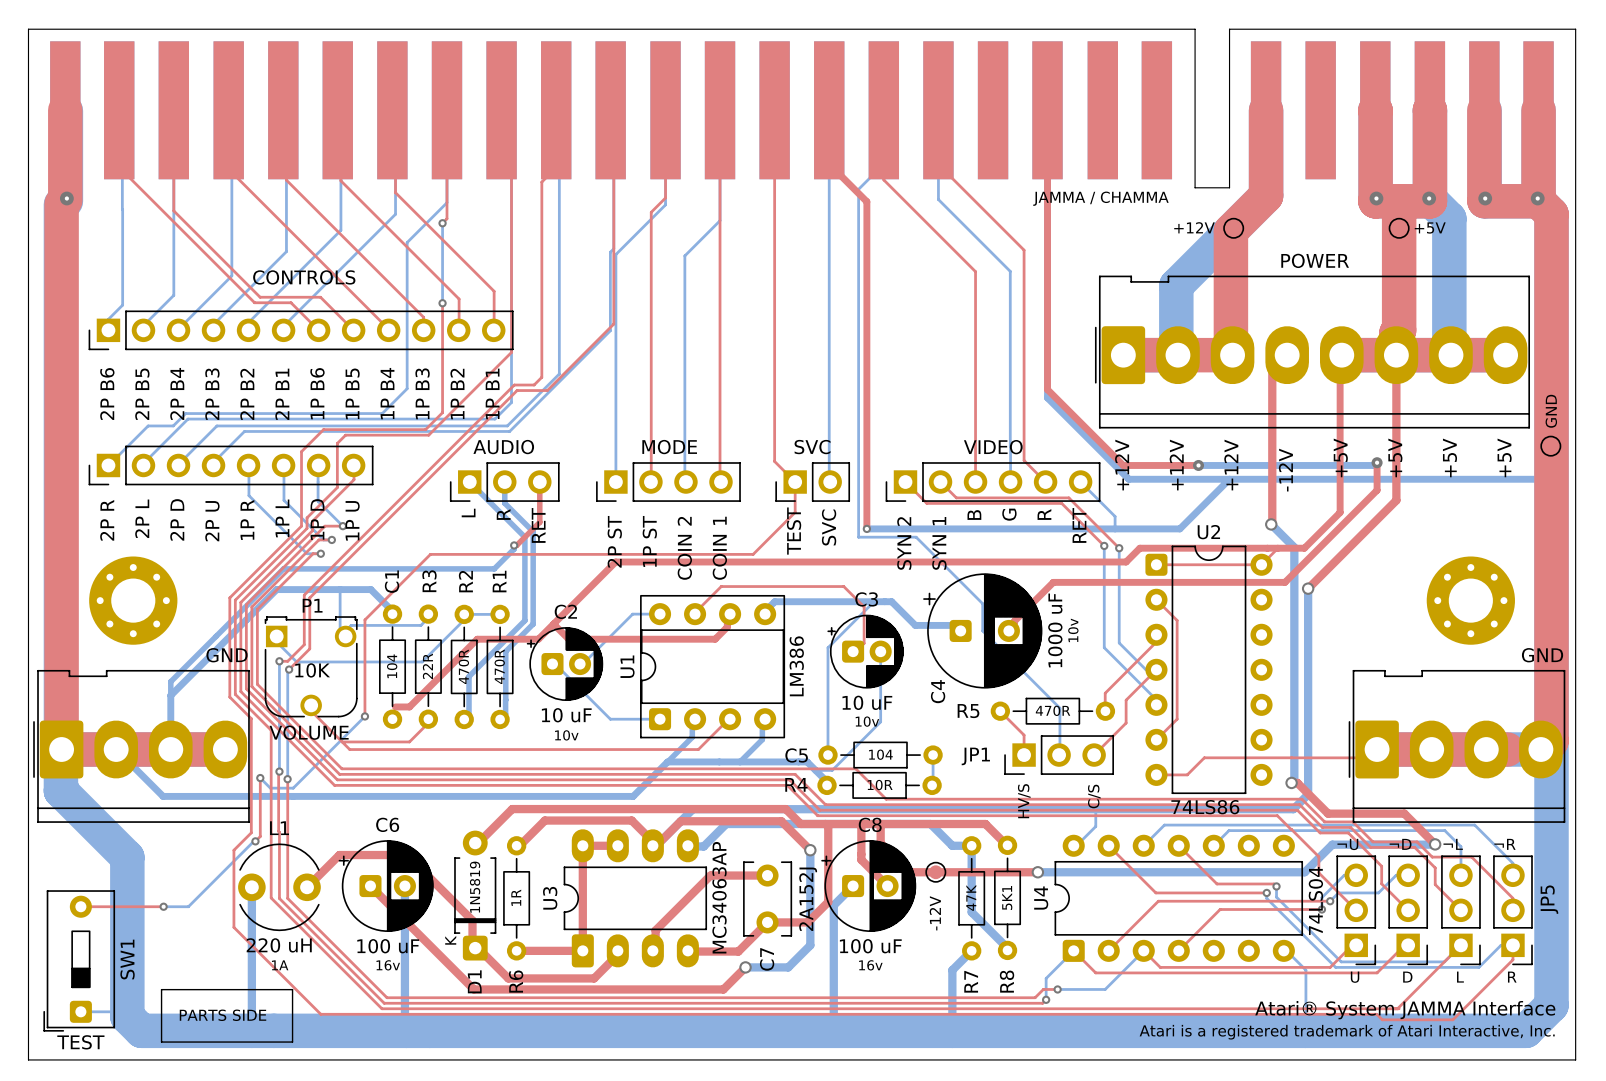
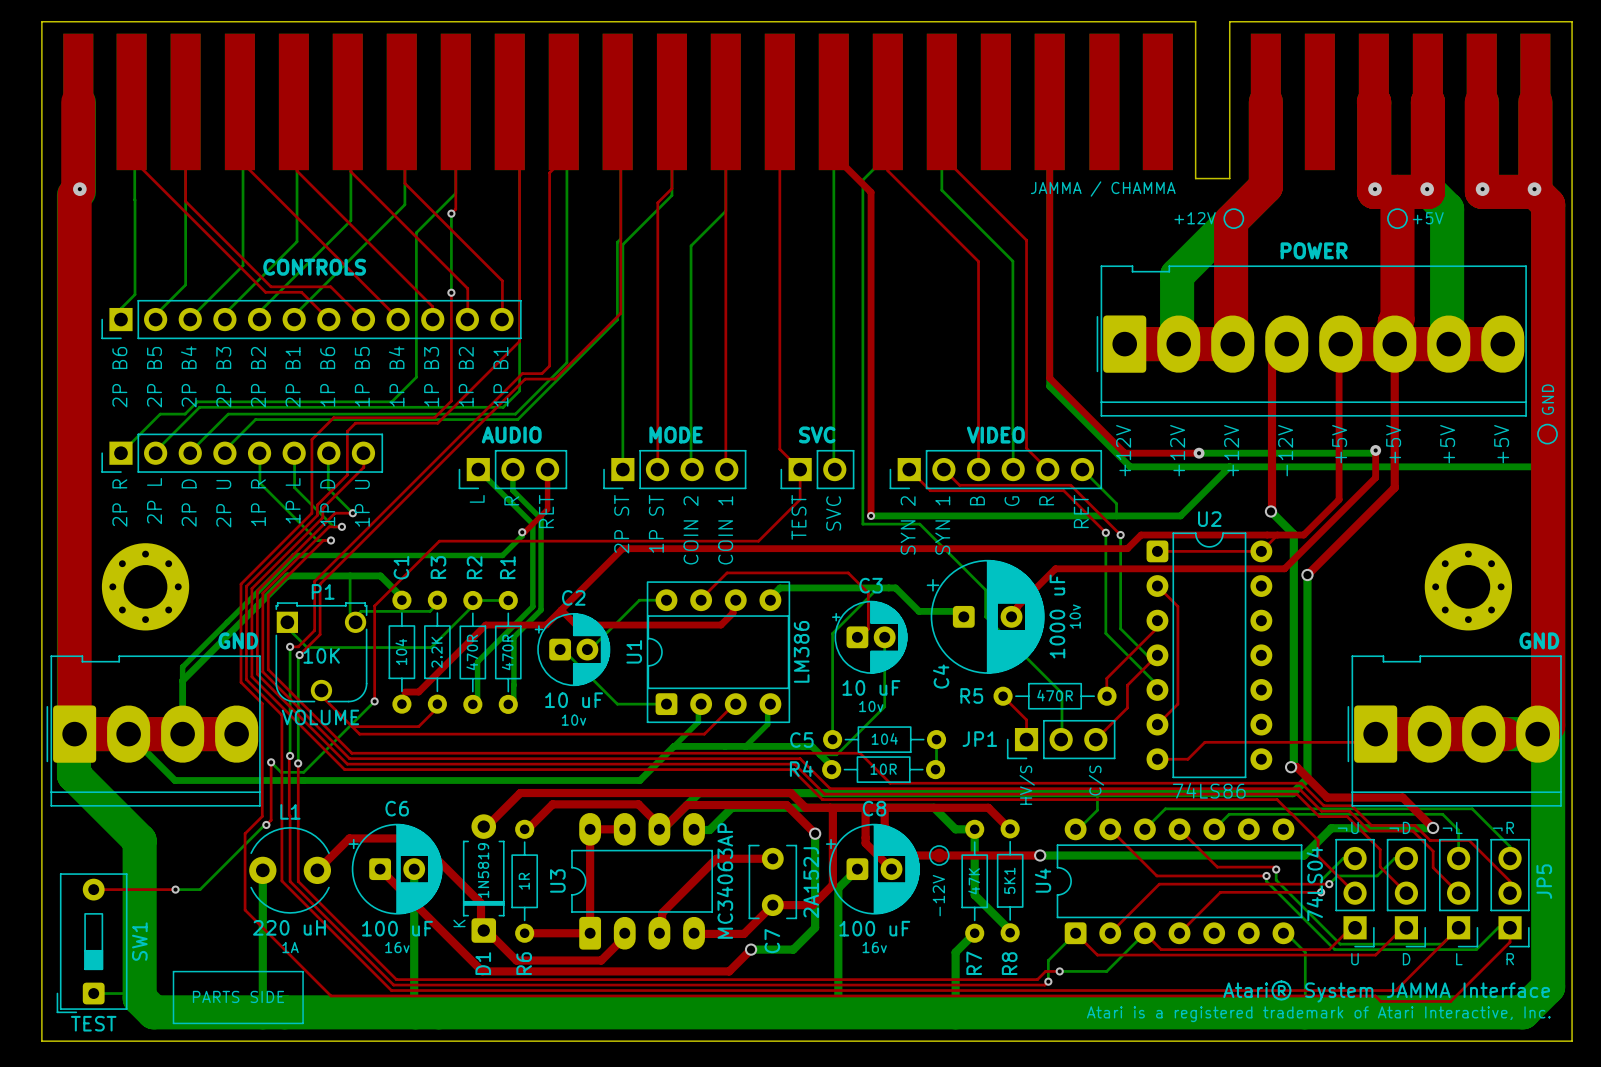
R3 value: 22R (427, 666) -> 2.2K (437, 652)

